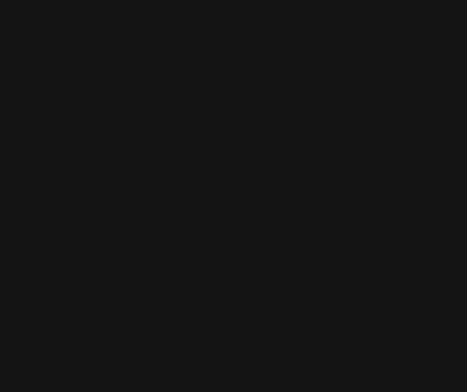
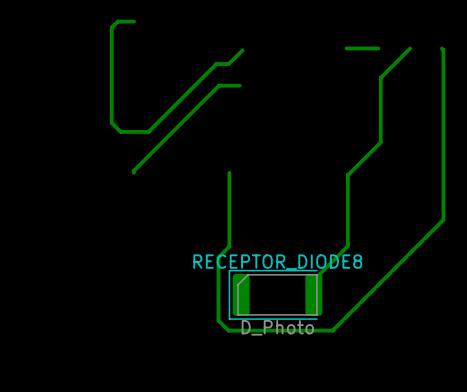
track: none -> (133, 21) (117, 21) (111, 27) (111, 122) (120, 131) (148, 131) (216, 64) (228, 64)
track: none -> (378, 48) (346, 48)
track: none -> (410, 48) (380, 77) (380, 142) (347, 174) (347, 246) (313, 280) (313, 294)
track: none -> (441, 48) (443, 219) (332, 330) (228, 330) (218, 320) (218, 257) (229, 246) (229, 172)
track: none -> (242, 50) (229, 63)
track: none -> (239, 85) (218, 85) (133, 172)
RECEPTOR_DIODE8: none -> D_Photo (275, 294)

